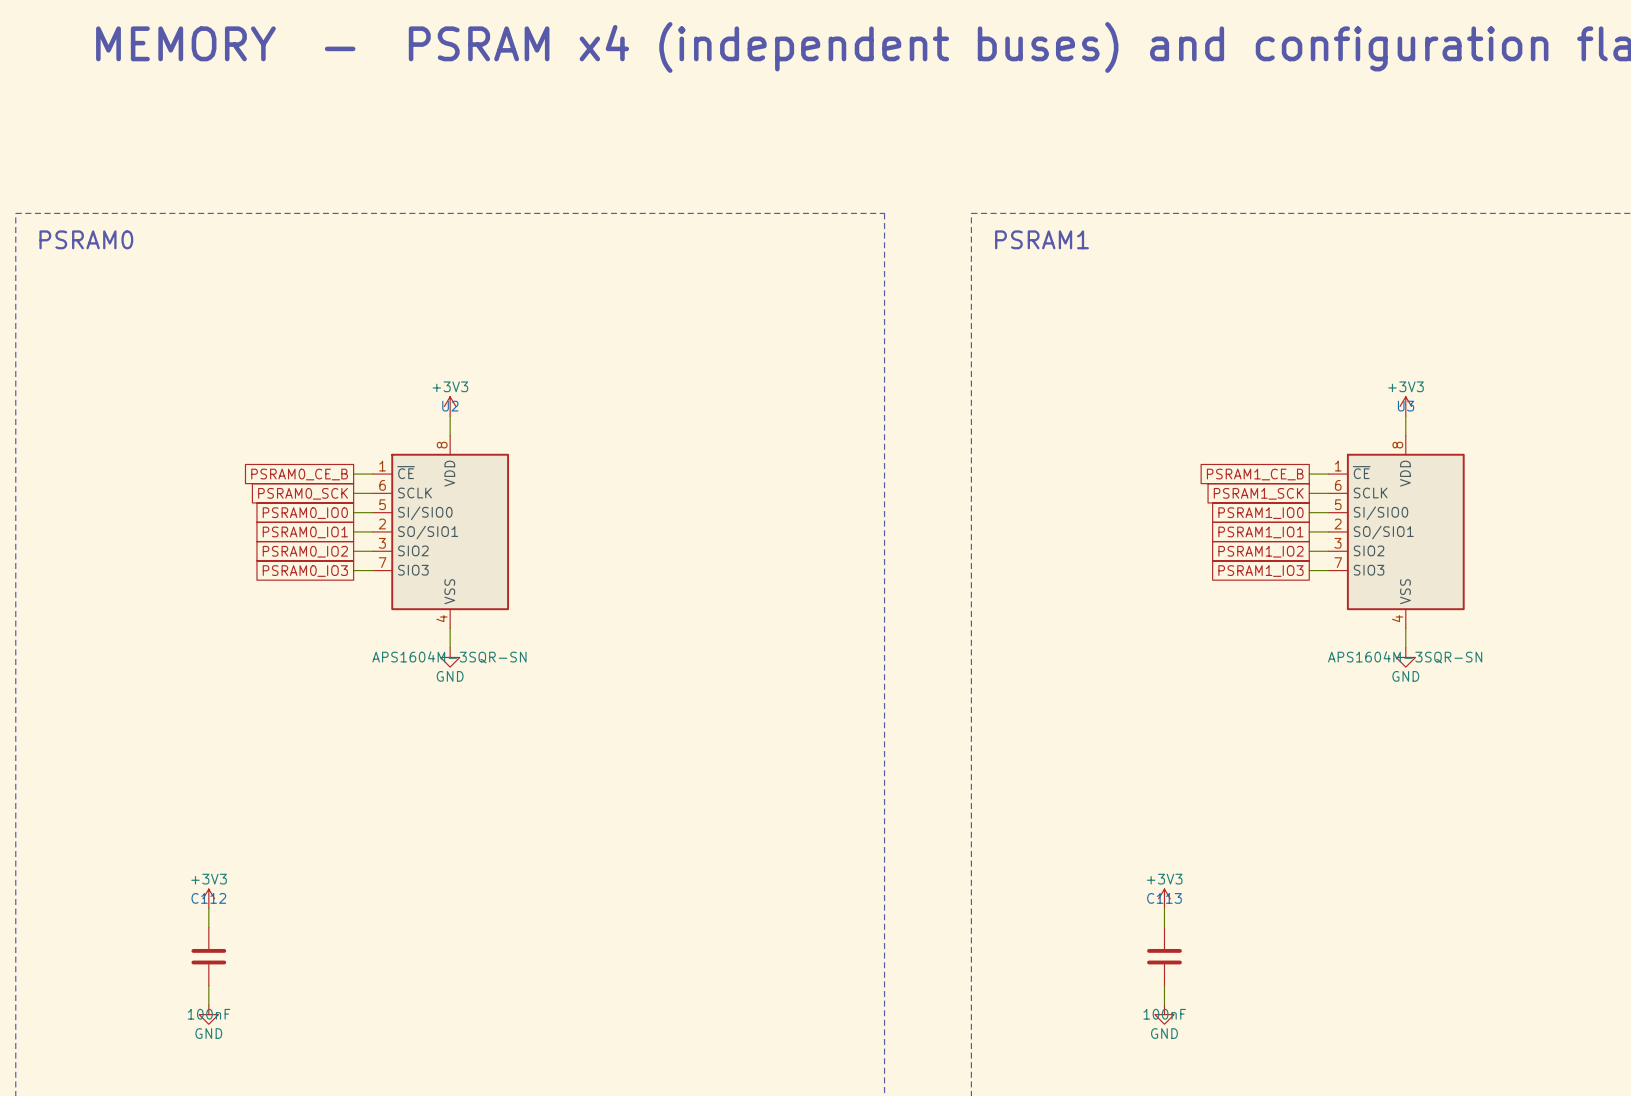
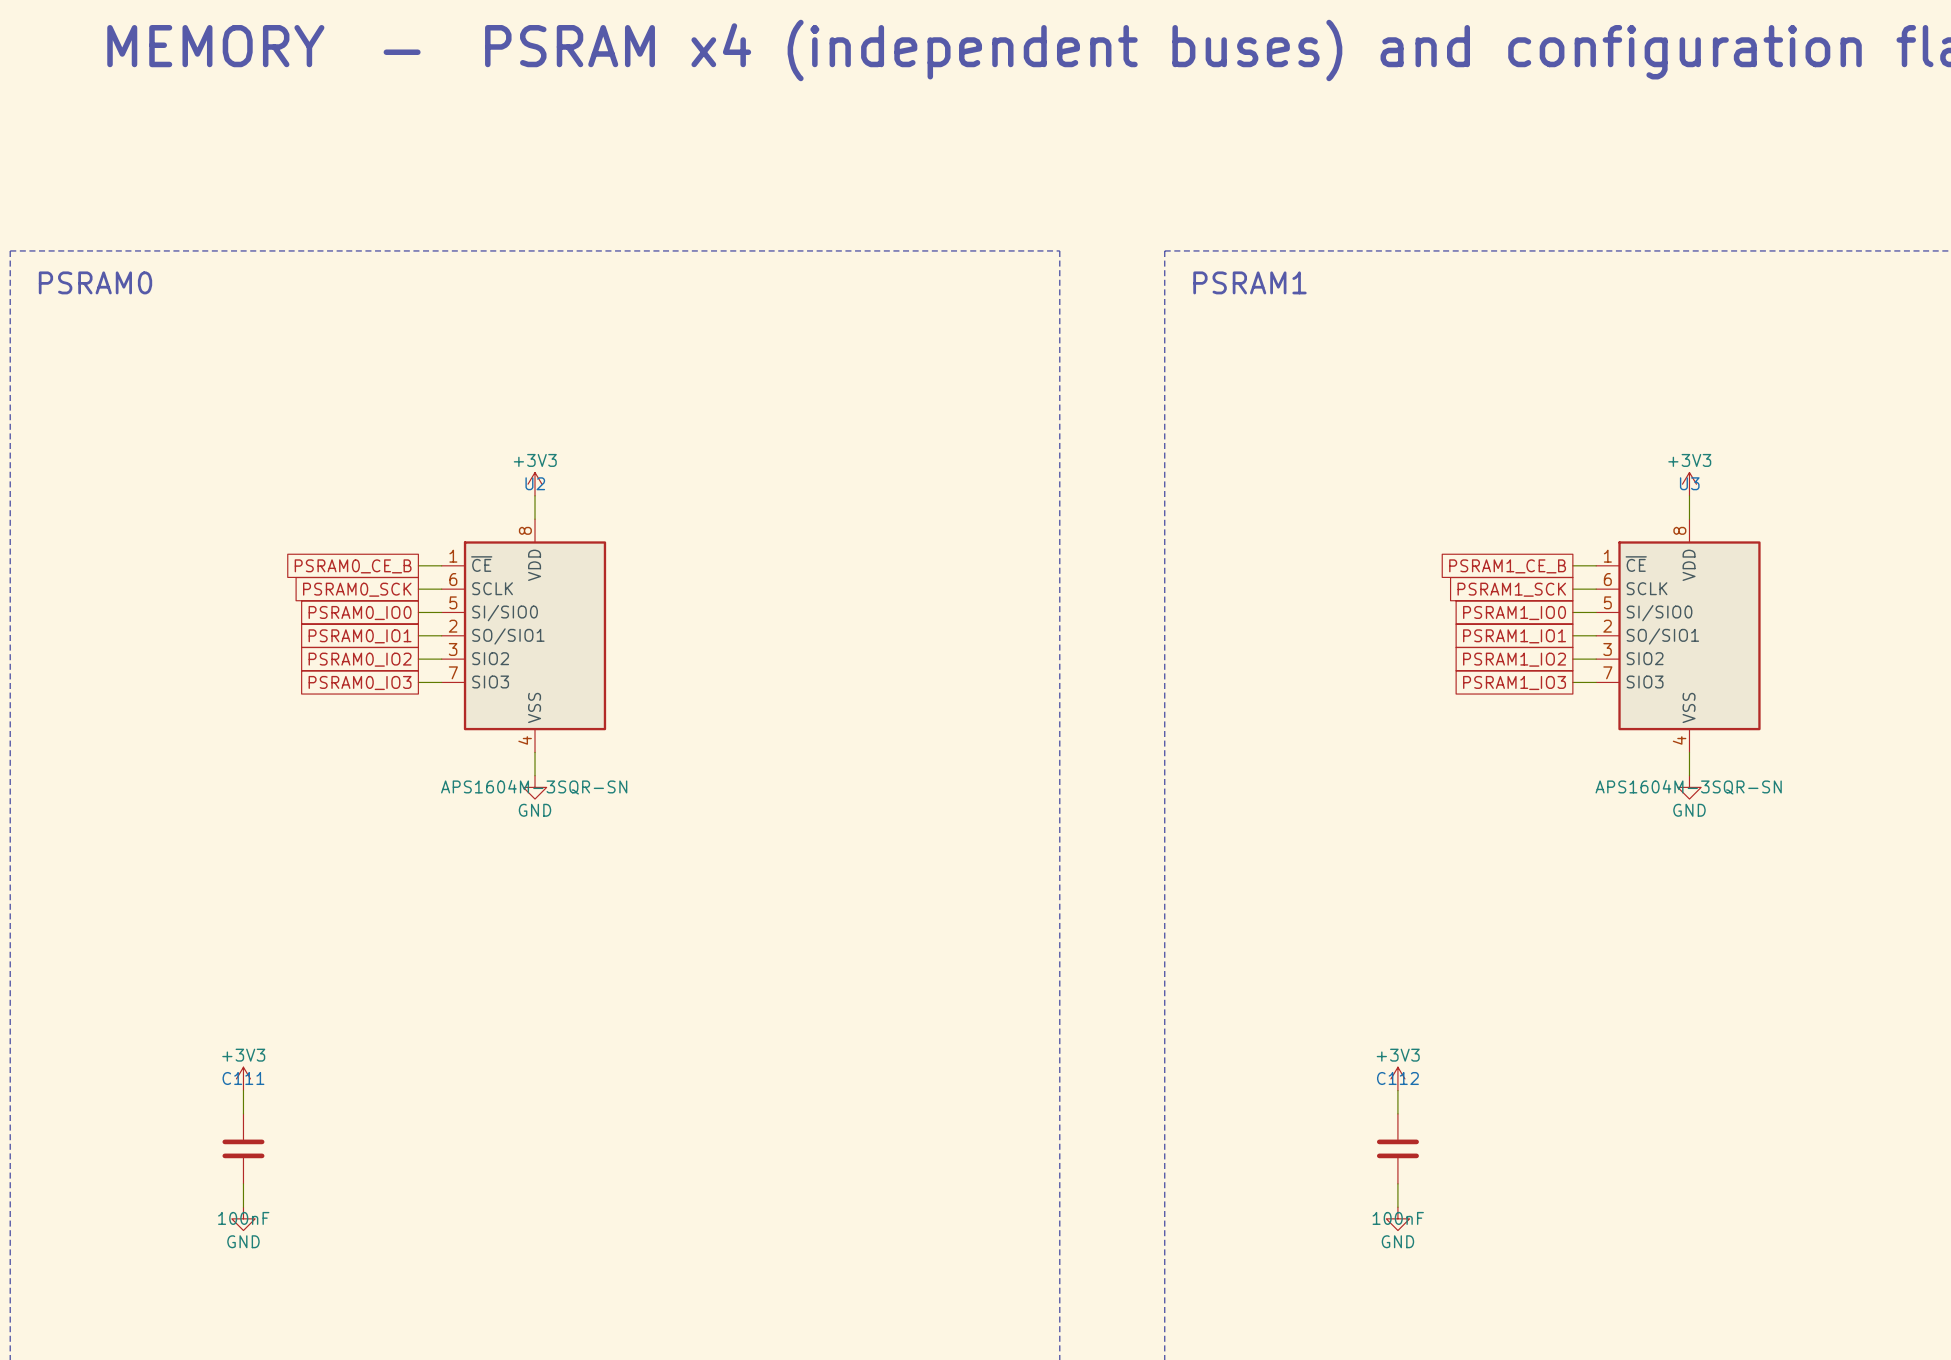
C112 name: C112 (208, 898) -> C111 (243, 1078)
C113 name: C113 (1164, 898) -> C112 (1397, 1078)

